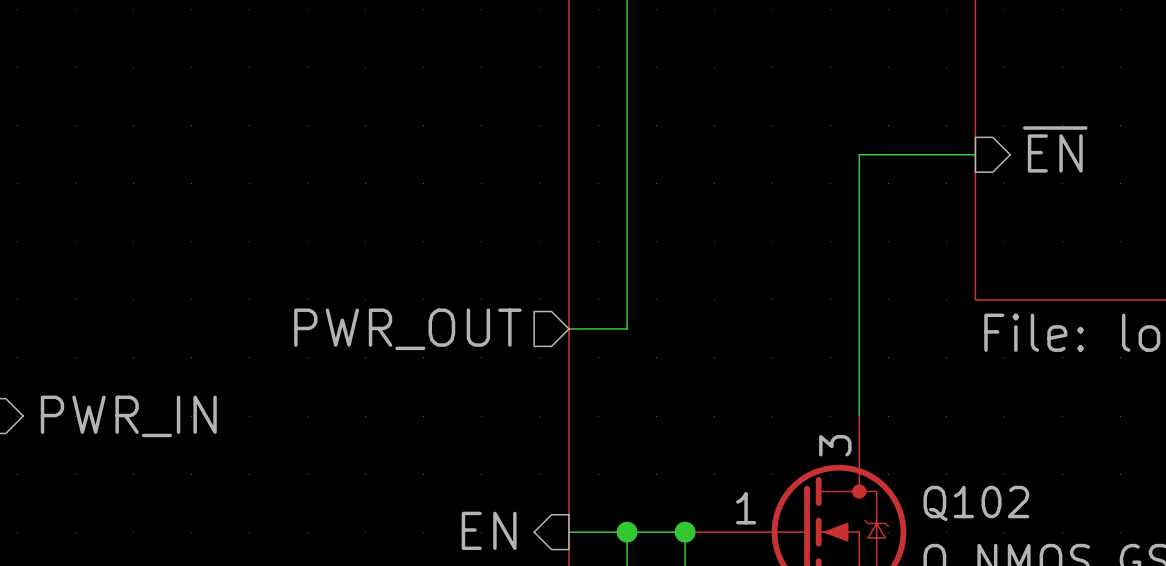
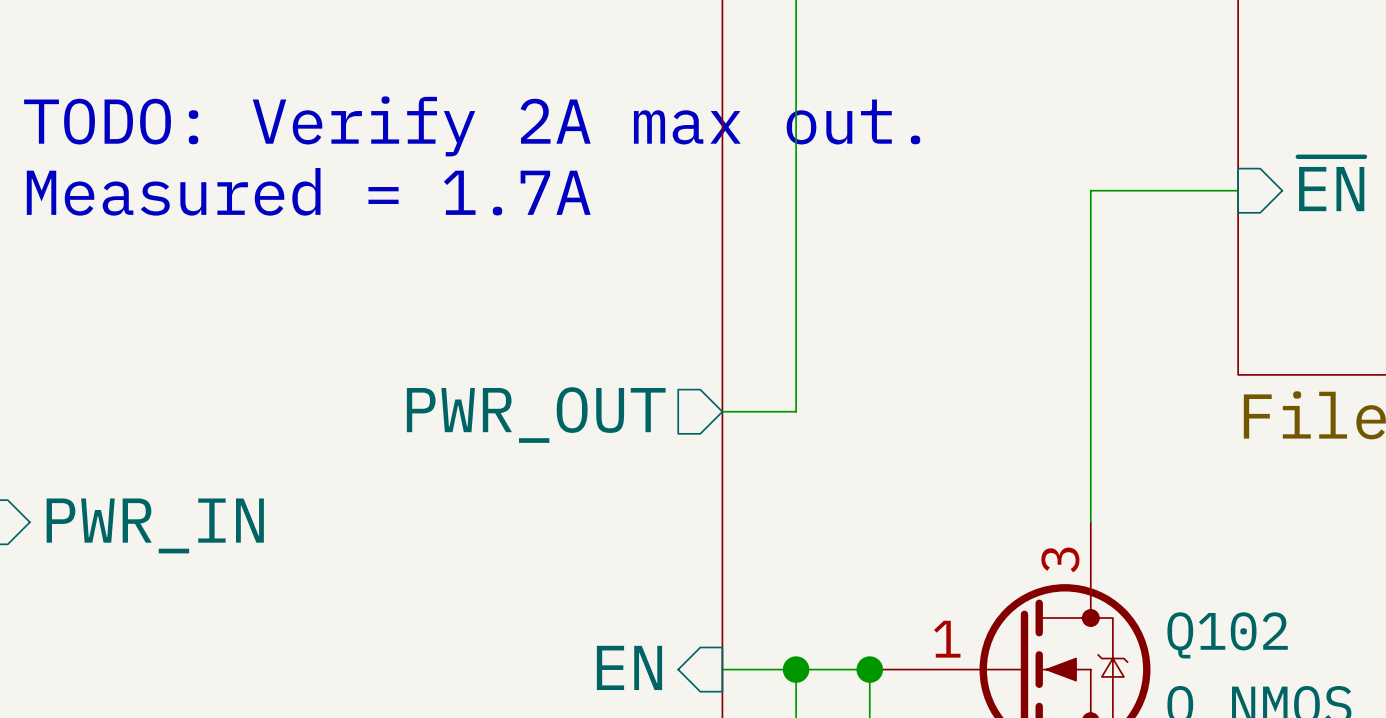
text: none -> TODO: Verify 2A max out. (472, 126)
text: none -> Measured = 1.7A (308, 191)

